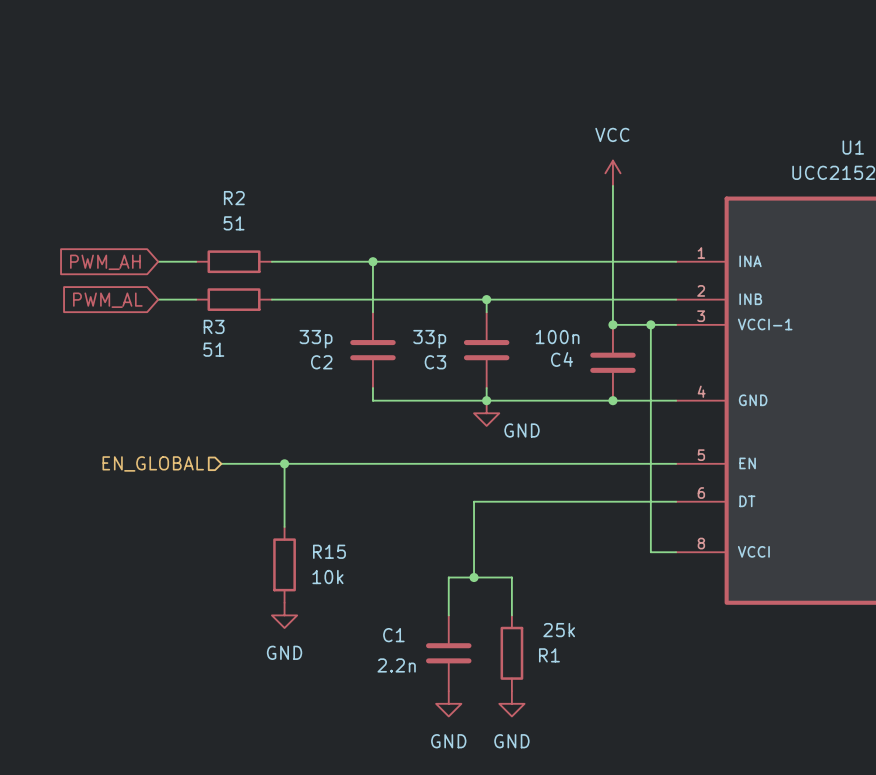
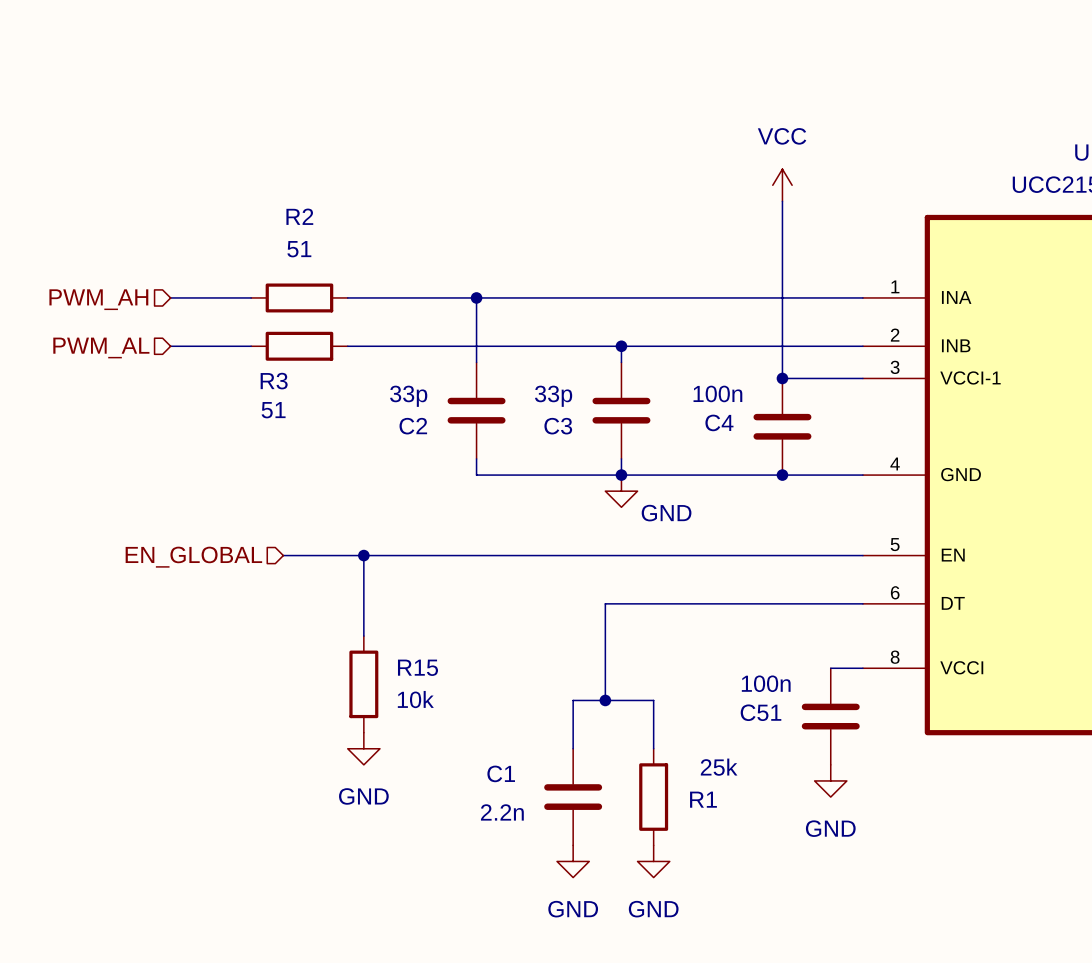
hierarchical label: none -> PWM_AH (98, 299)
wire: none -> (170, 297) (202, 297)
global label: PWM_AH (105, 262) -> none
hierarchical label: none -> PWM_AL (101, 347)
wire: none -> (170, 346) (202, 346)
global label: PWM_AL (107, 300) -> none
wire: (650, 324) (650, 552) -> none
junction: (650, 324) -> none
C51: none -> 100n (830, 716)
power symbol: none -> GND (830, 780)

